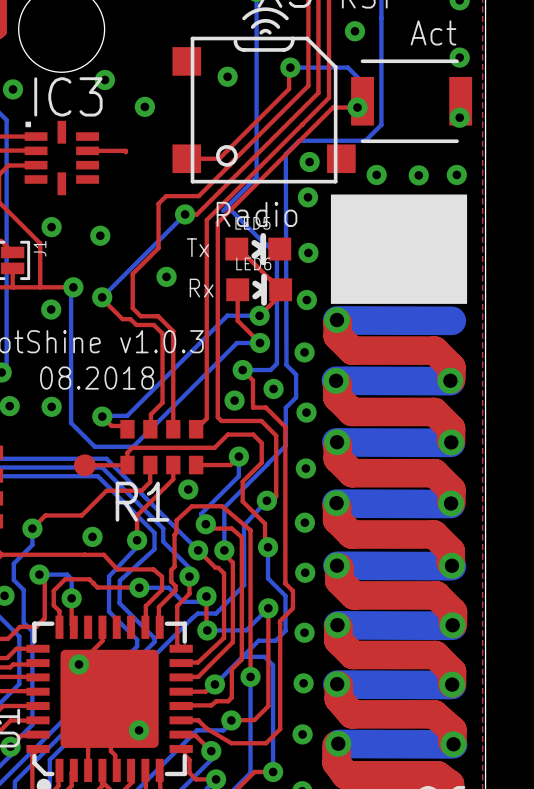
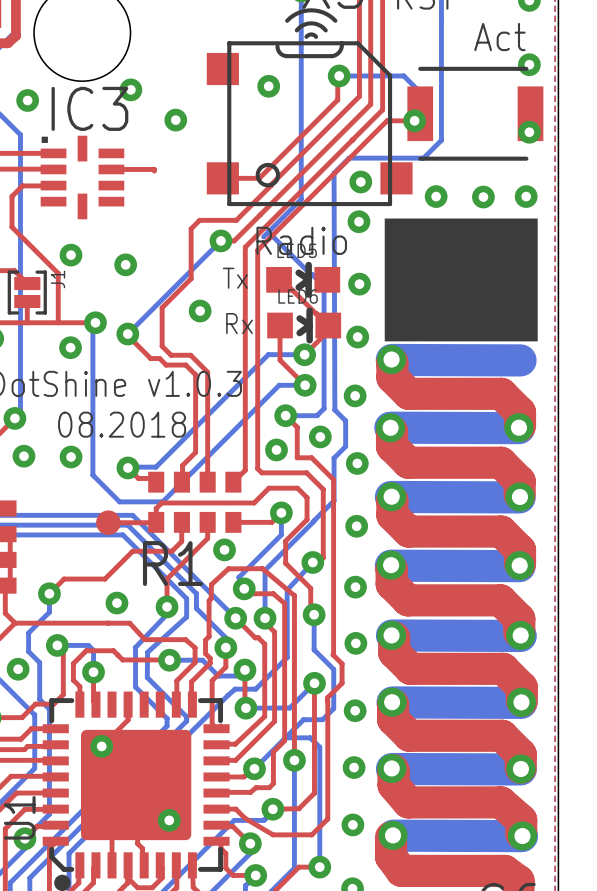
via: (354, 31) -> none

